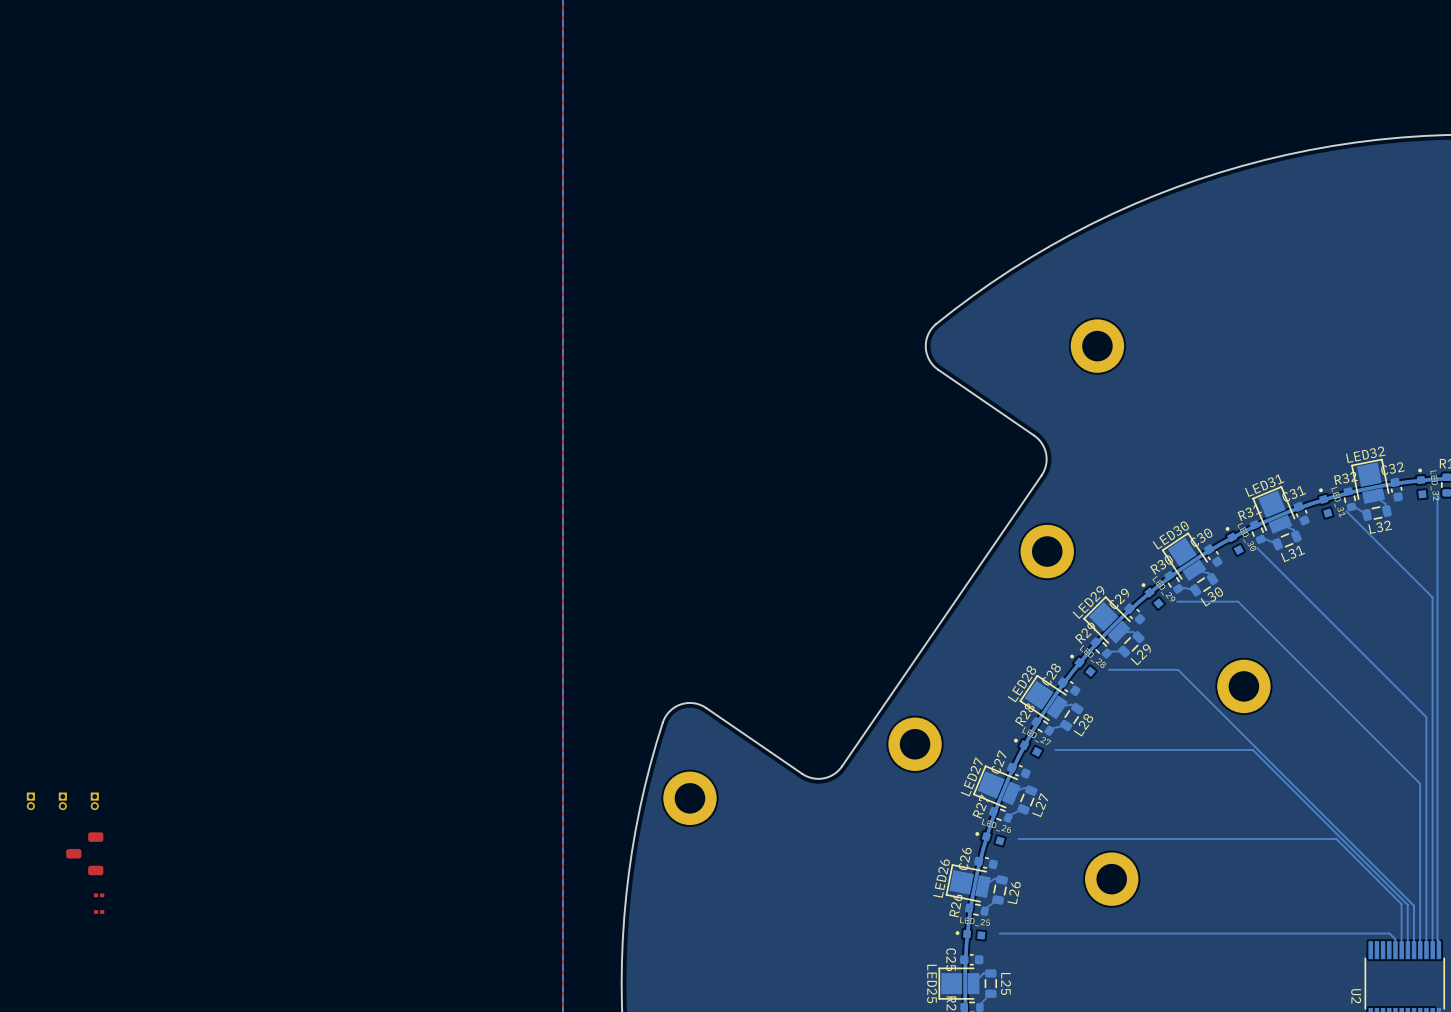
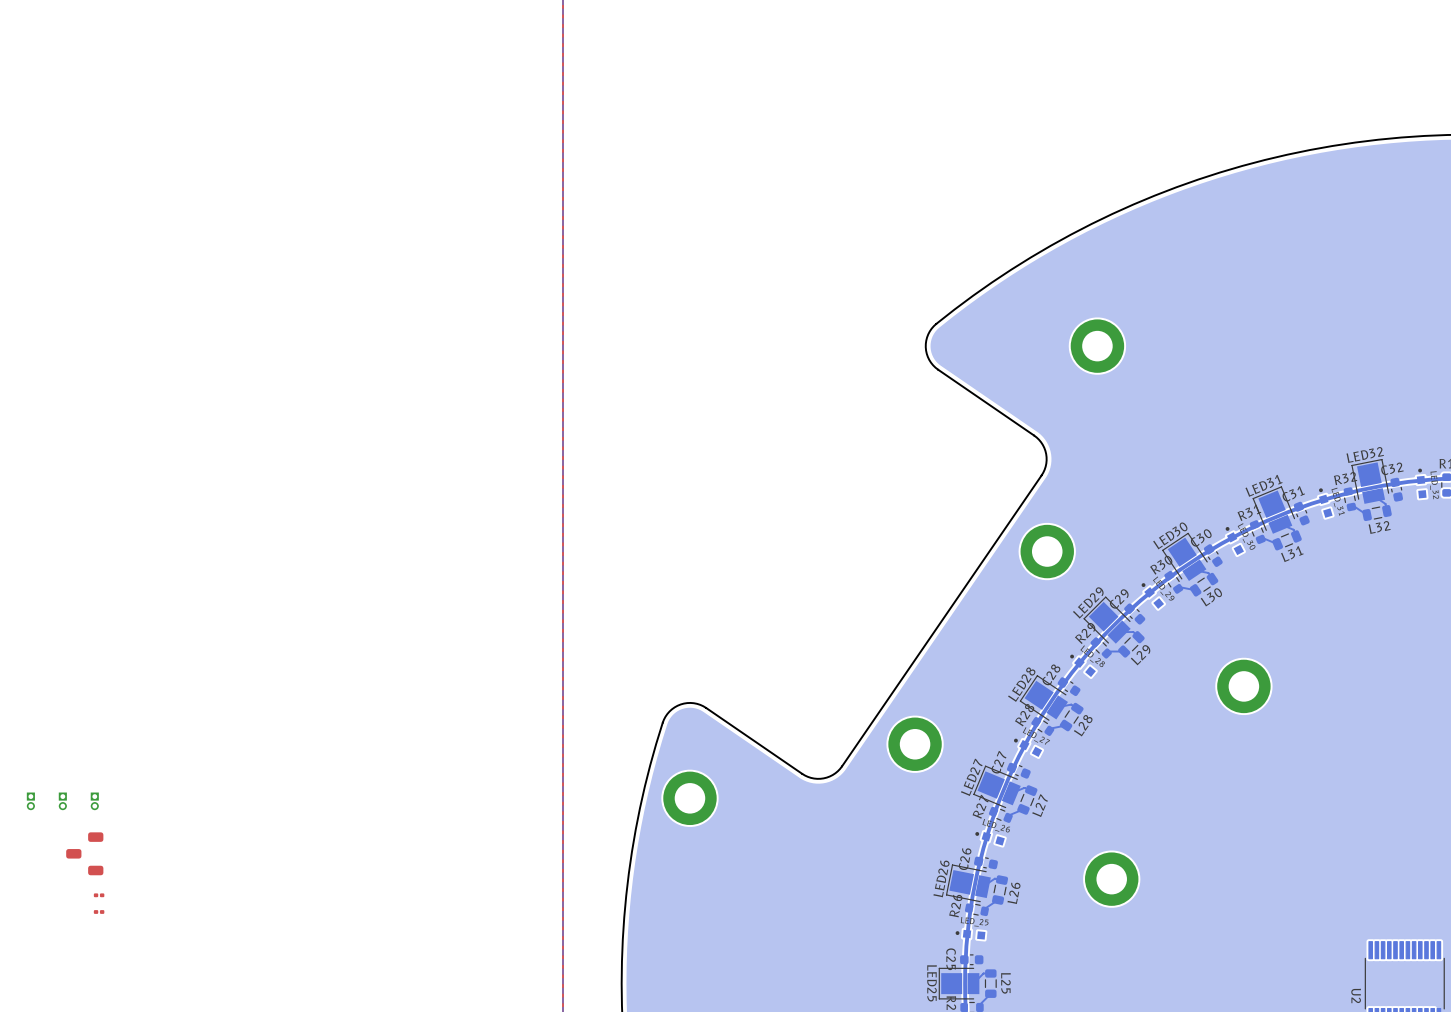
bottom track: (1438, 494) (1438, 948) -> none
bottom track: (1346, 511) (1432, 597) (1432, 948) -> none
bottom track: (1257, 548) (1426, 717) (1426, 948) -> none
bottom track: (1177, 601) (1238, 601) (1420, 783) (1420, 948) -> none
bottom track: (1108, 669) (1178, 669) (1413, 905) (1413, 948) -> none
bottom track: (1055, 749) (1252, 749) (1407, 904) (1407, 948) -> none
bottom track: (1018, 839) (1336, 839) (1401, 904) (1401, 948) -> none
bottom track: (999, 933) (1389, 933) (1395, 939) (1395, 948) -> none

